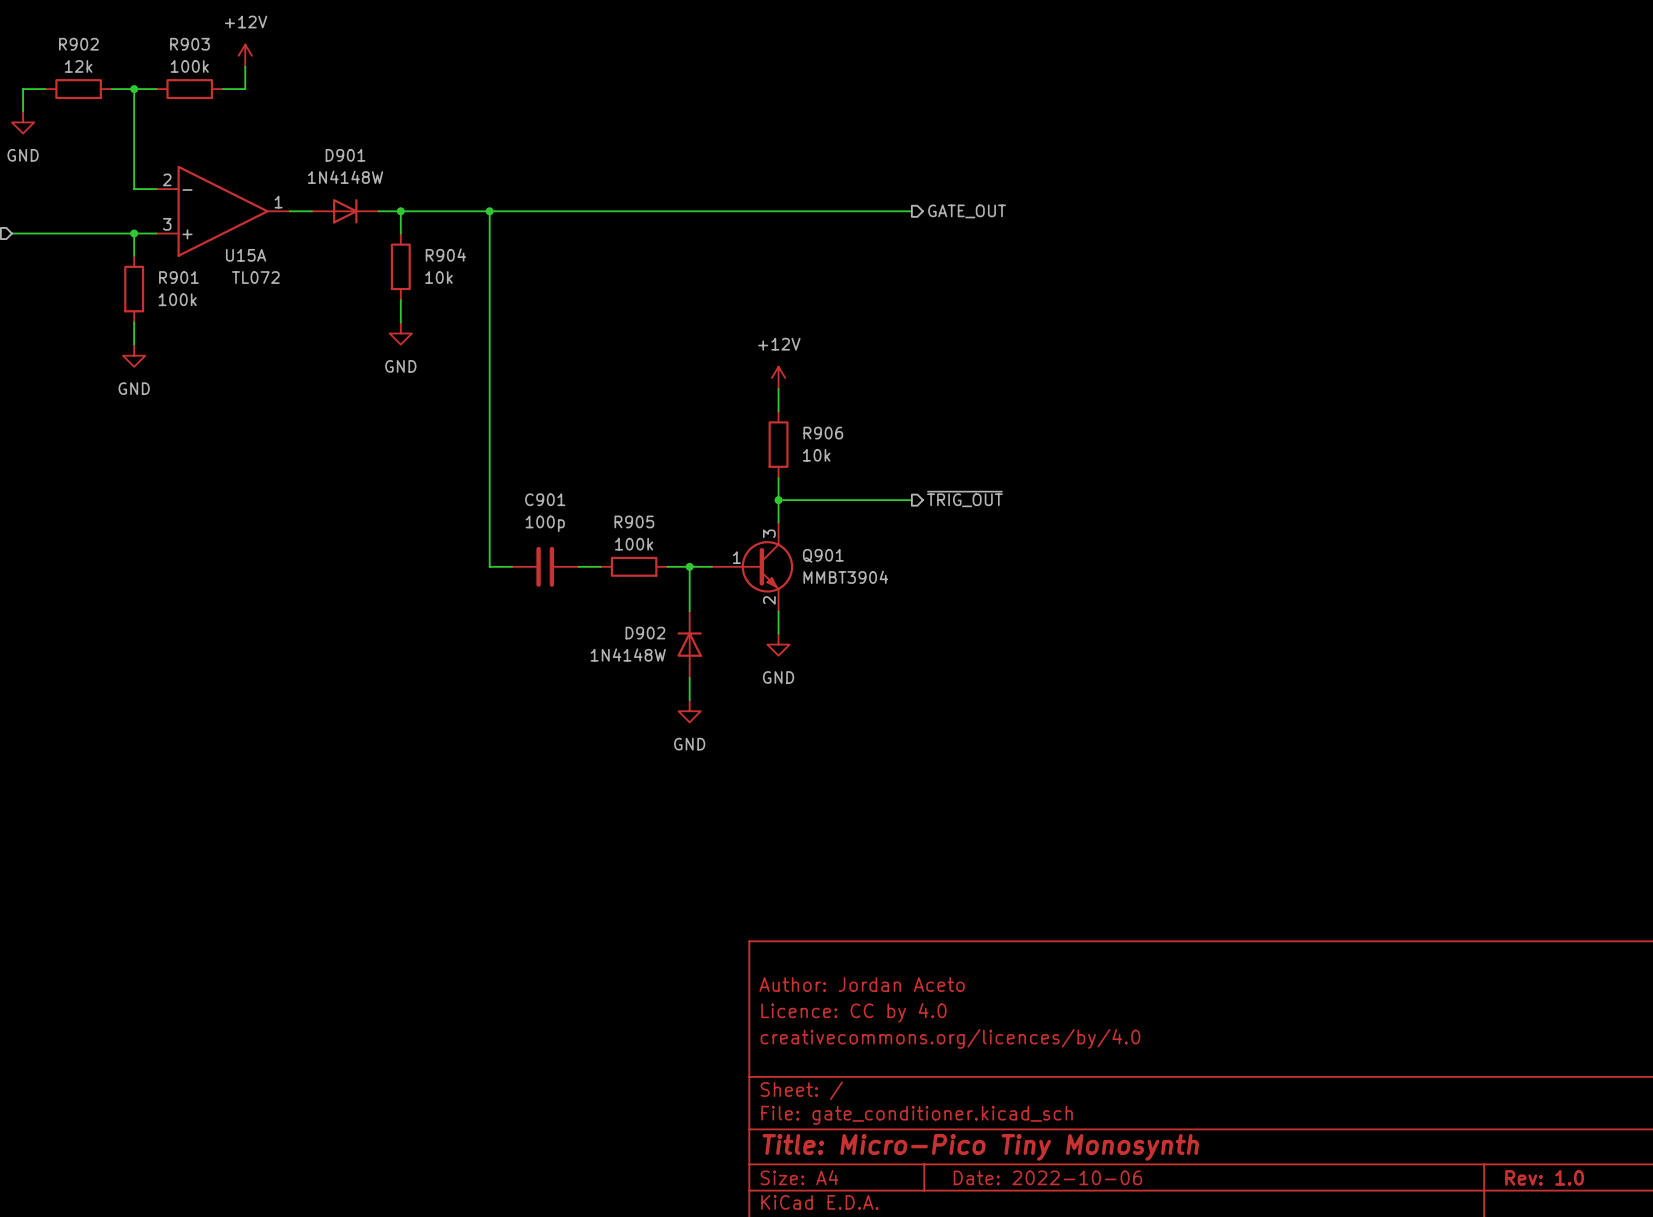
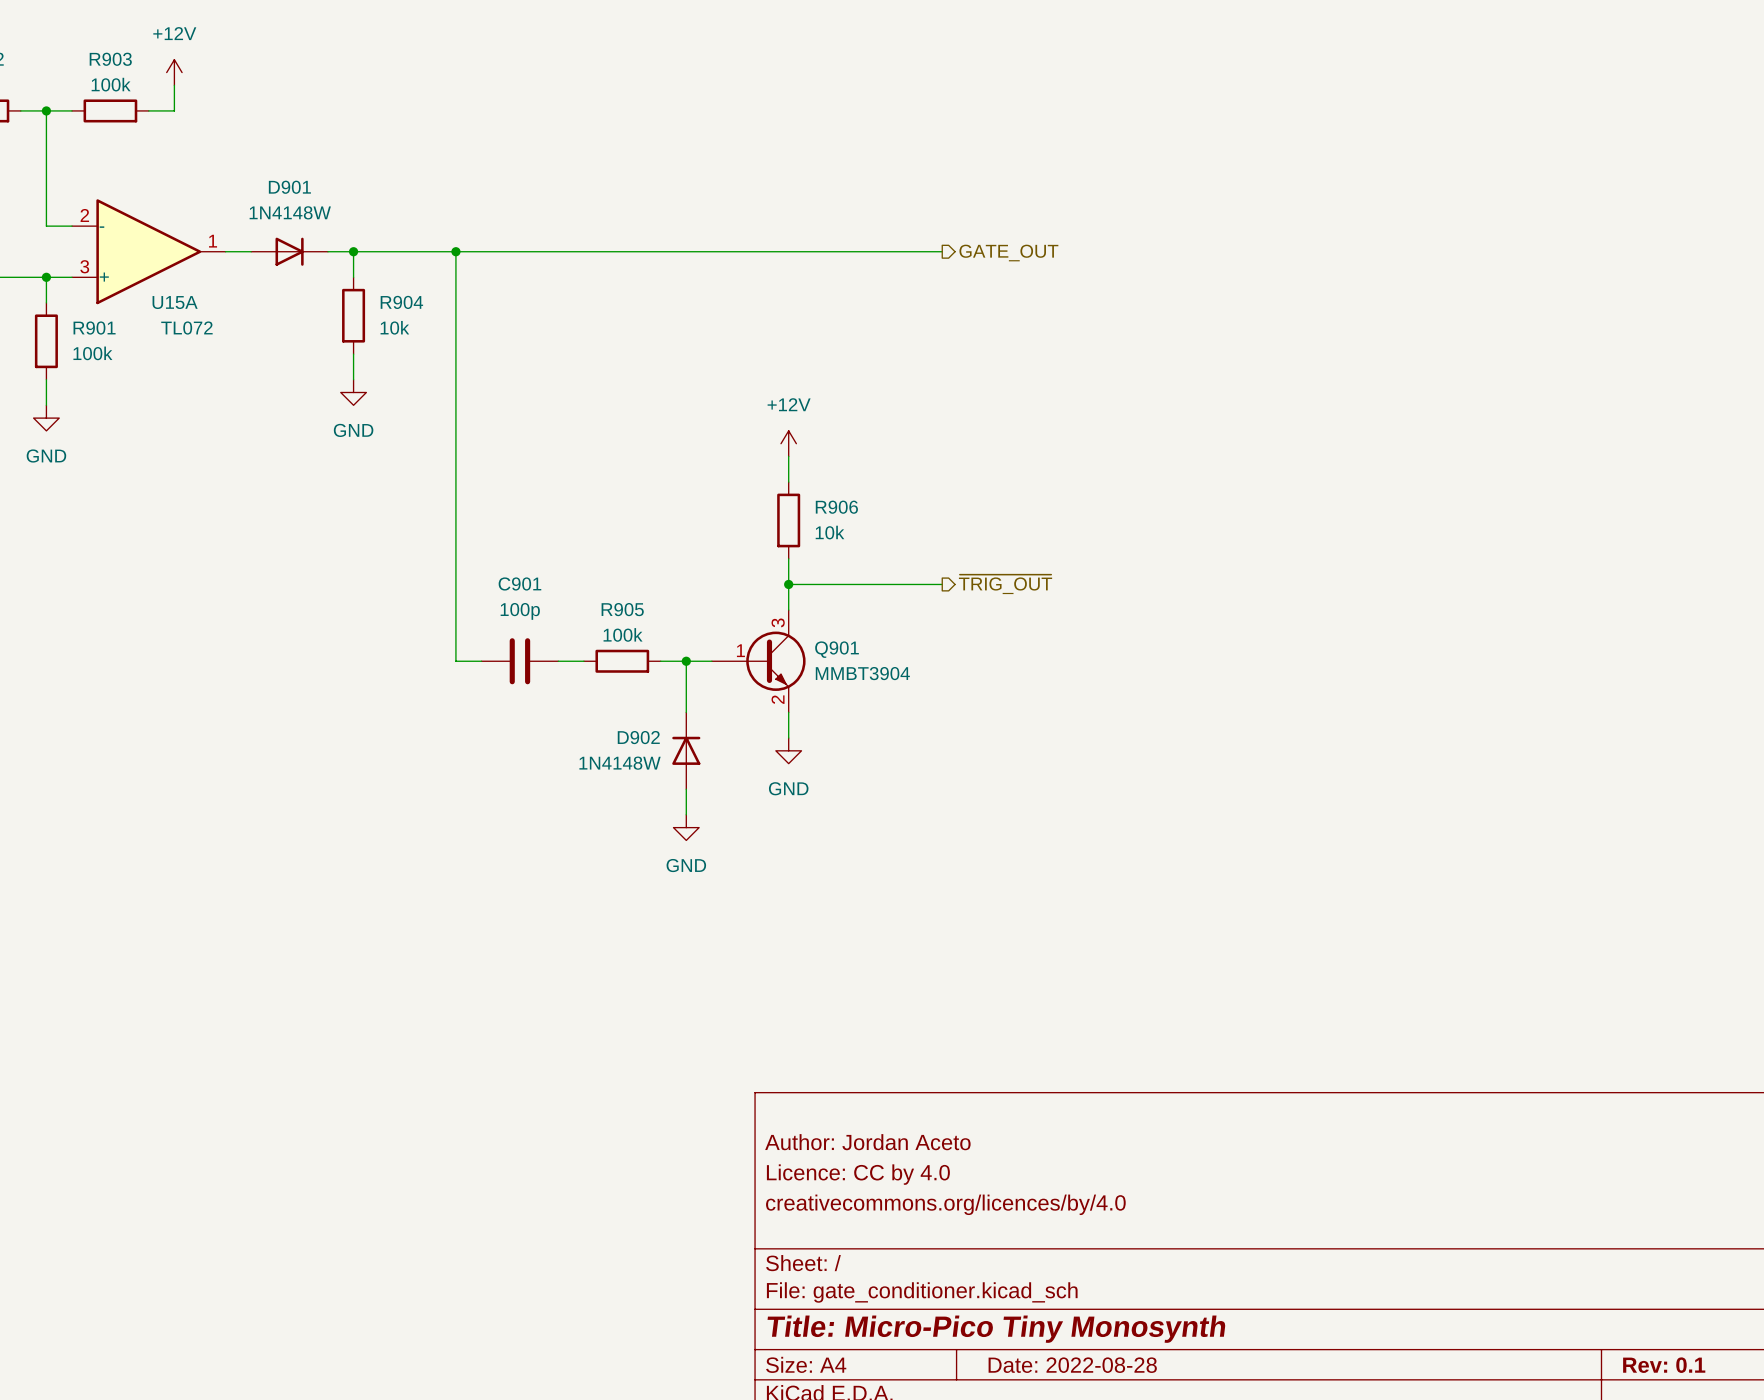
title block: Date: 2022-10-06 (1047, 1177) -> Date: 2022-08-28 (1072, 1365)
title block: Rev: 1.0 (1544, 1177) -> Rev: 0.1 (1664, 1365)

